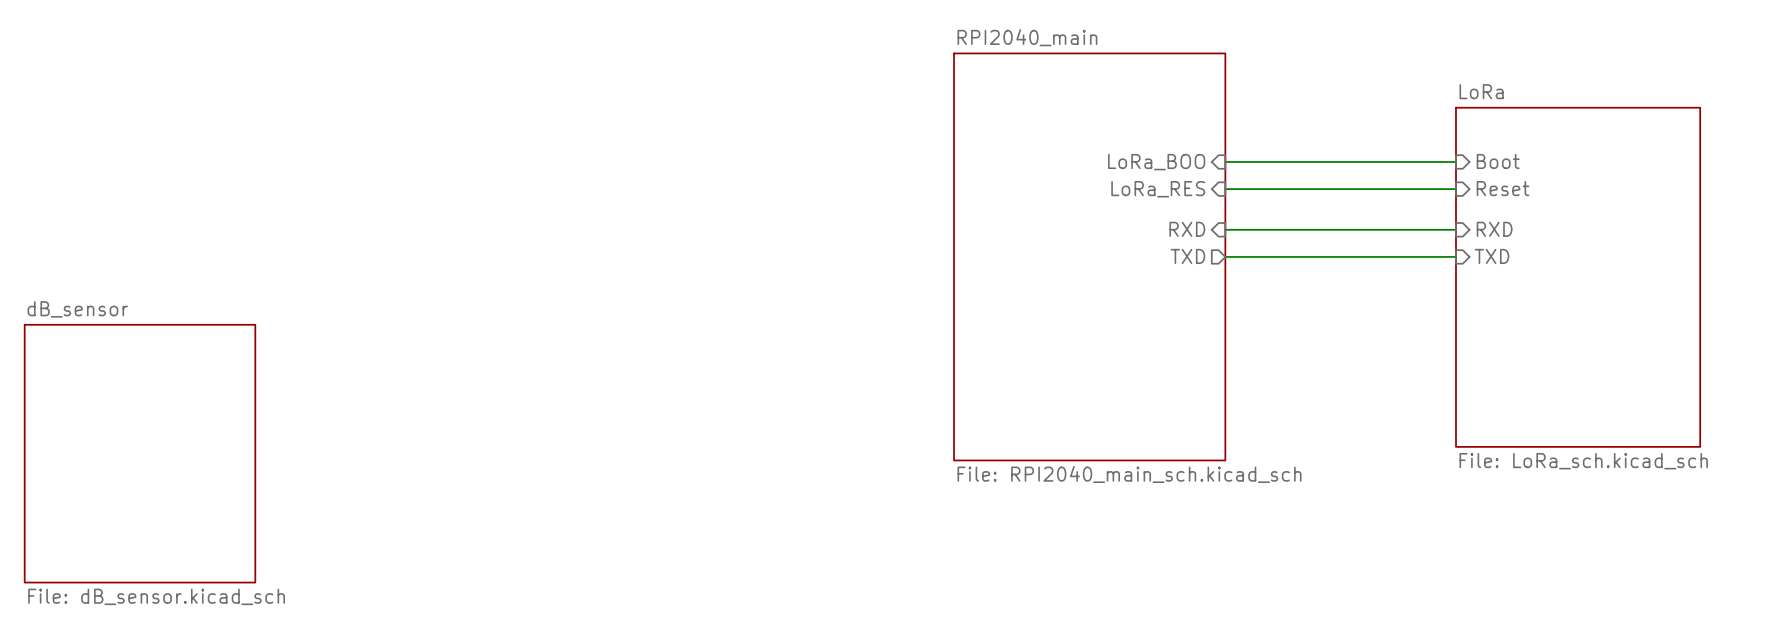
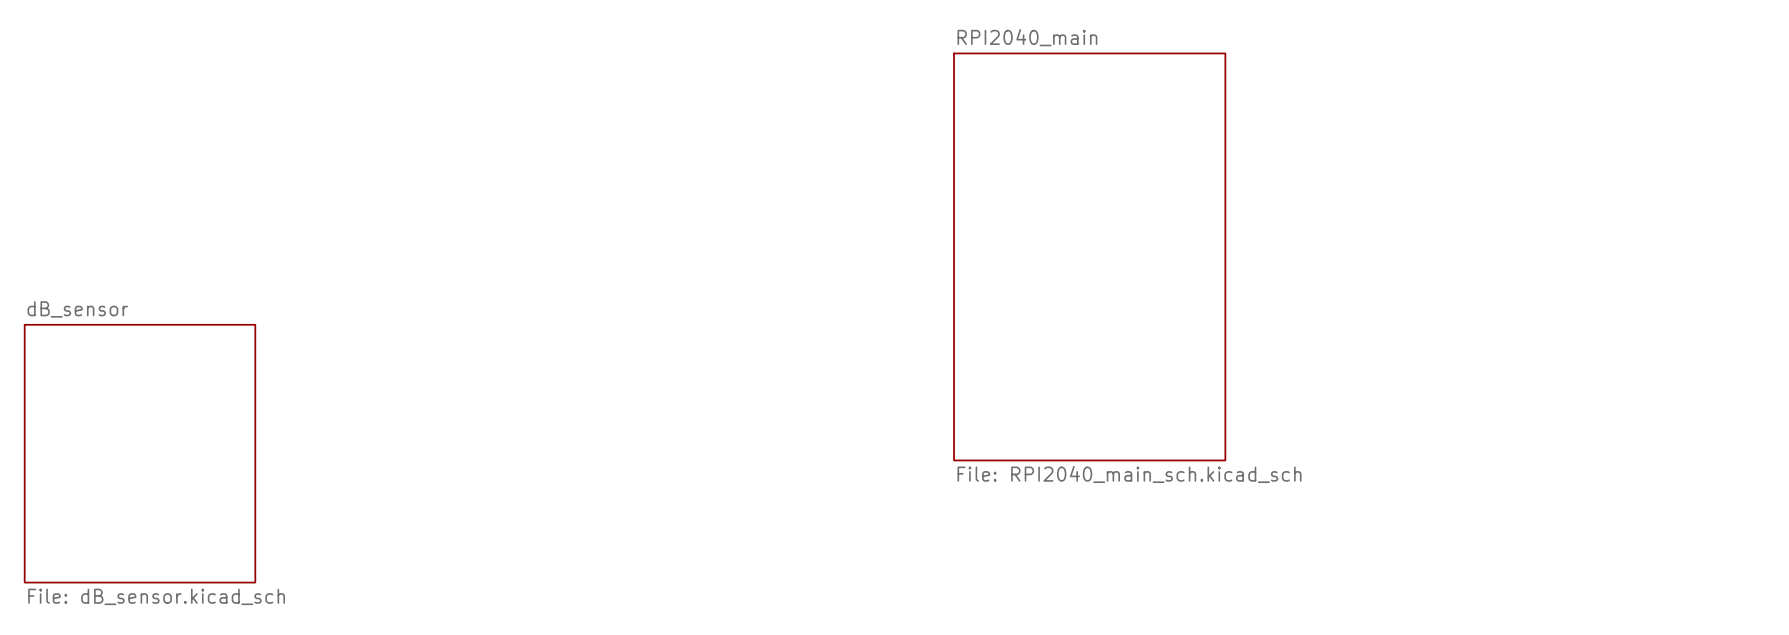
wire: (1225, 161) (1455, 161) -> none
sheet pin: Boot (1498, 161) -> none
sheet pin: LoRa_BOO (1156, 162) -> none
sheet pin: Reset (1503, 188) -> none
sheet pin: LoRa_RES (1158, 189) -> none
wire: (1225, 189) (1455, 189) -> none
sheet pin: RXD (1187, 229) -> none
wire: (1225, 229) (1455, 229) -> none
sheet pin: RXD (1494, 229) -> none
sheet pin: TXD (1187, 256) -> none
wire: (1225, 256) (1455, 256) -> none
sheet pin: TXD (1492, 256) -> none
sheet LoRa: File: LoRa_sch.kicad_sch (1578, 277) -> none

